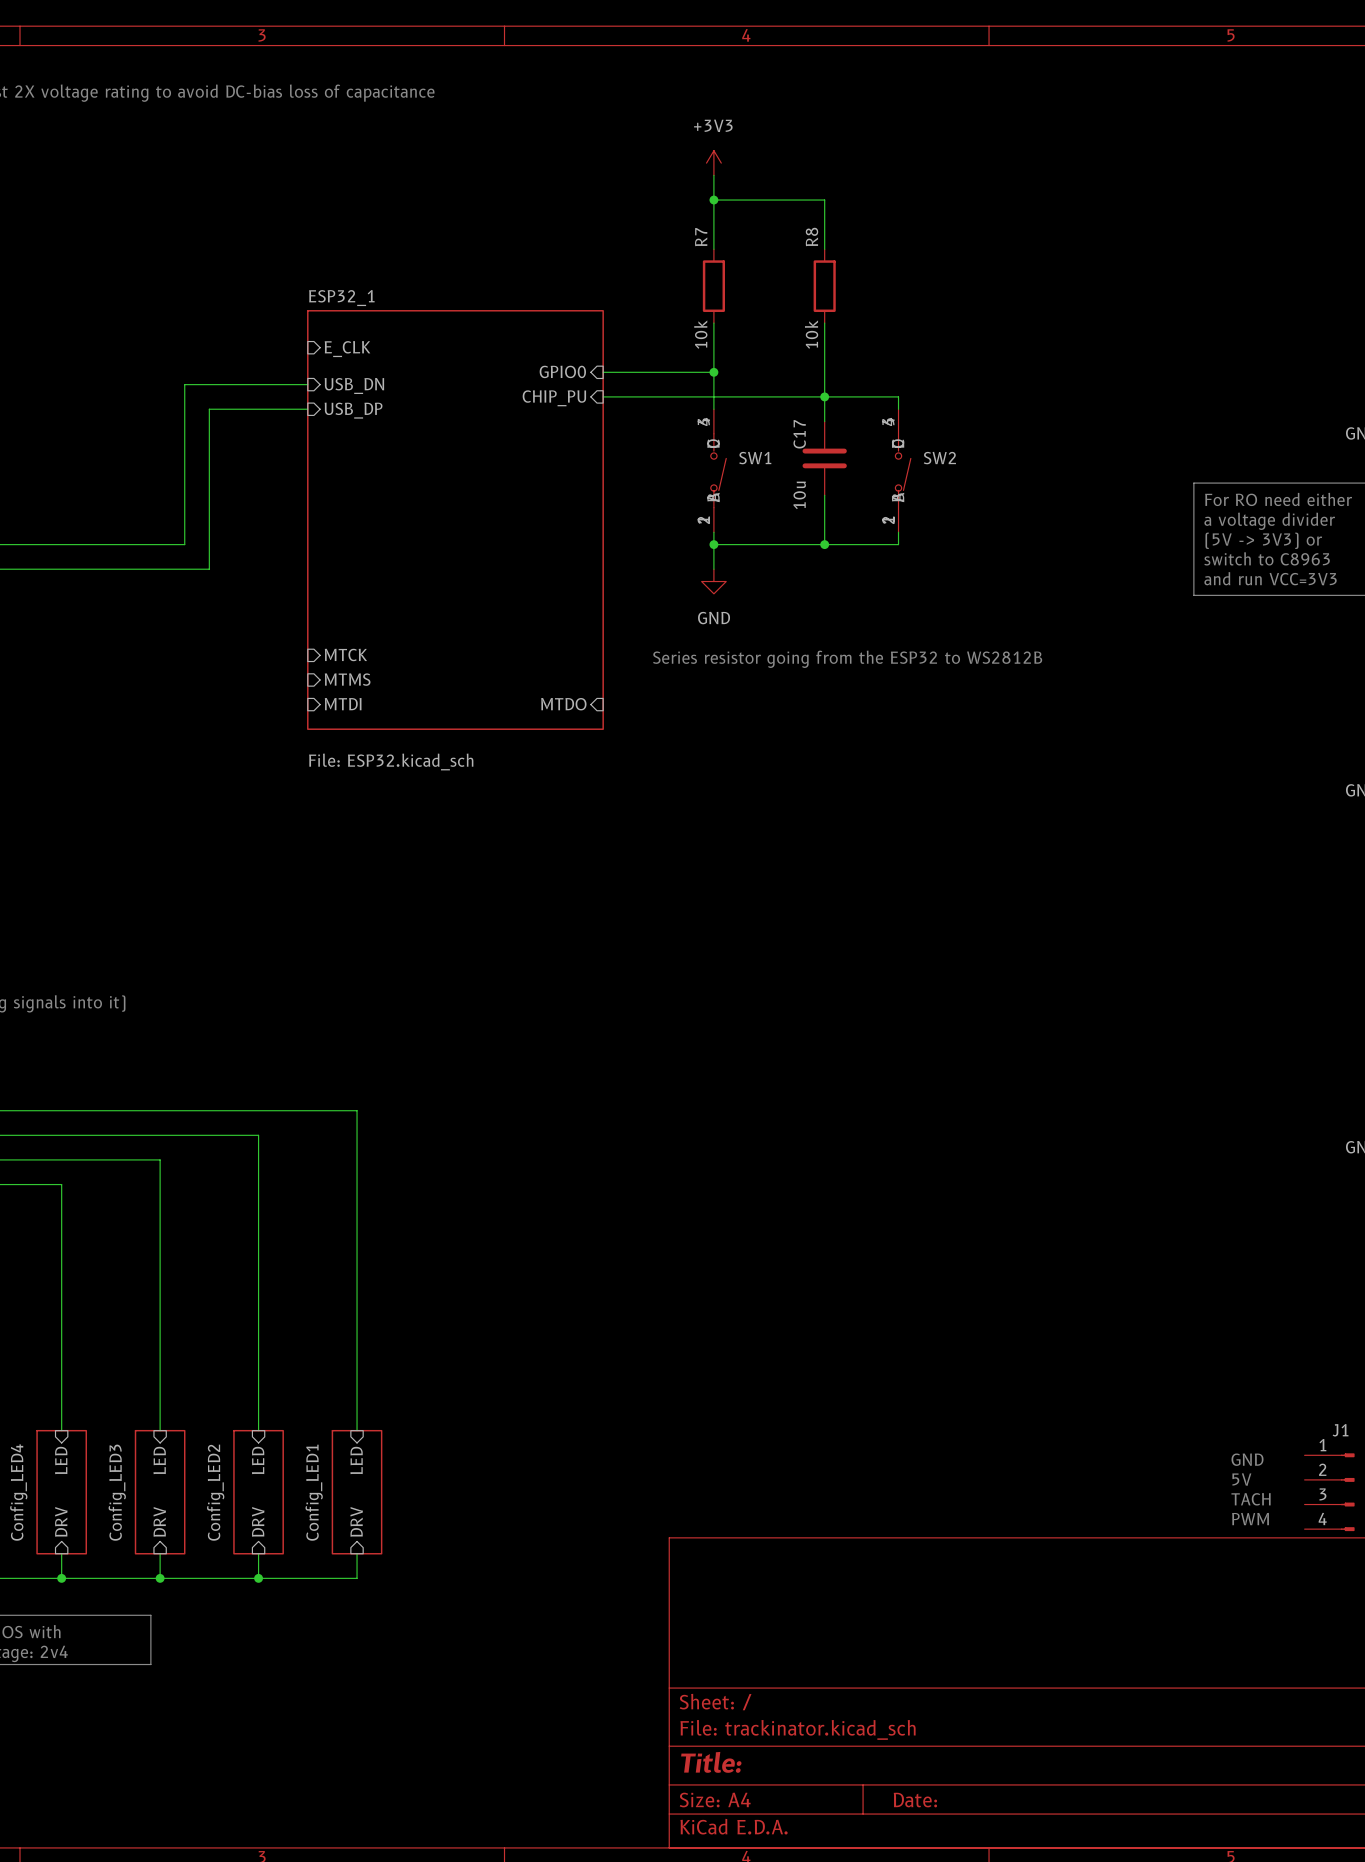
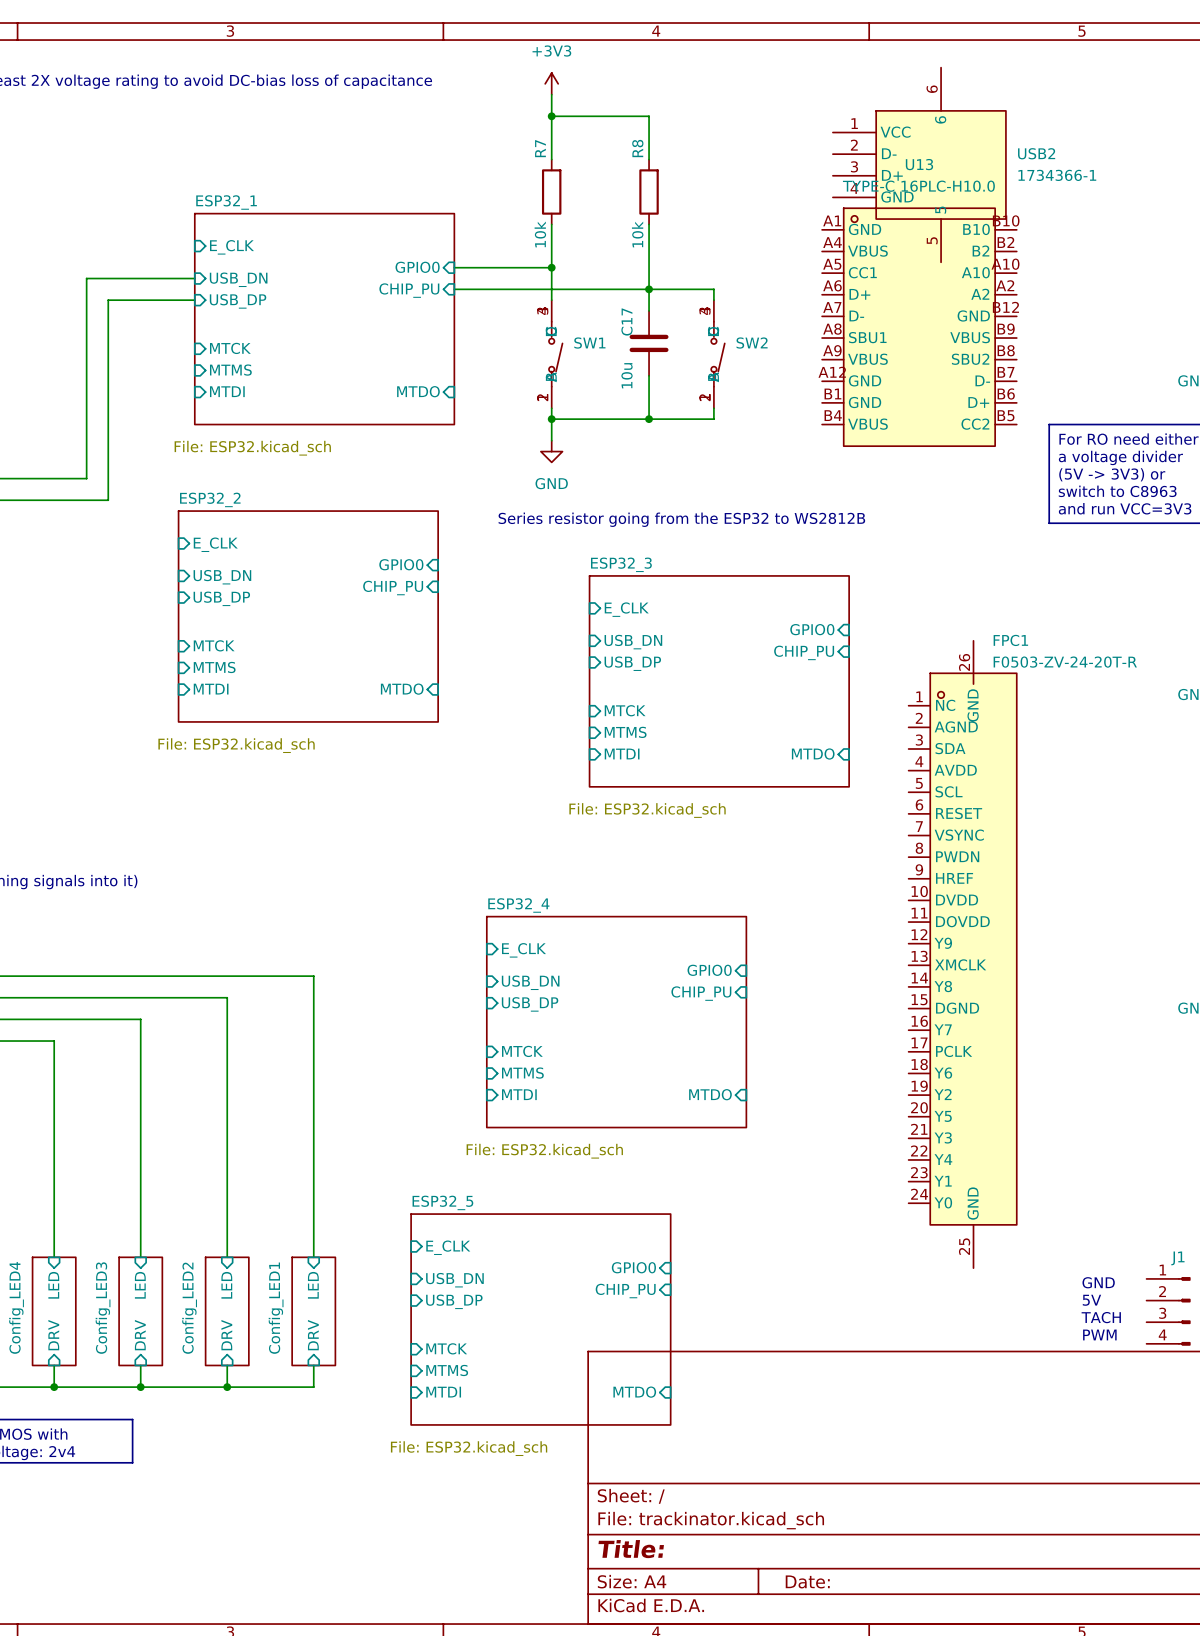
junction: none -> (551, 116)
power symbol position: +3V3 (713, 163) -> +3V3 (551, 83)
wire: (713, 175) (713, 249) -> (551, 94) (551, 159)
USB2: none -> 1734366-1 (919, 164)
wire: (713, 200) (824, 200) (824, 249) -> (551, 116) (649, 116) (649, 159)
junction: (713, 200) -> none
R7 position: (713, 286) -> (551, 192)
R8 position: (824, 286) -> (649, 192)
sheet ESP32_1 name position: ESP32_1 (341, 298) -> ESP32_1 (226, 202)
junction: none -> (551, 267)
sheet ESP32_1 shape: [307, 310, 604, 730] -> [194, 212, 456, 426]
wire: (713, 323) (713, 409) -> (551, 224) (551, 300)
wire: (824, 323) (824, 421) -> (649, 224) (649, 310)
sheet pin position: E_CLK (347, 349) -> E_CLK (231, 247)
sheet pin position: GPIO0 (562, 371) -> GPIO0 (417, 267)
wire: (603, 372) (713, 372) -> (454, 267) (551, 267)
junction position: (713, 372) -> (649, 289)
U13: none -> TYPE-C 16PLC-H10.0 (919, 327)
wire: (307, 384) (184, 384) (184, 544) (98, 544) -> (194, 278) (86, 278) (86, 478)
sheet pin position: USB_DN (354, 386) -> USB_DN (238, 279)
sheet pin: none -> MTCK (230, 348)
wire: (603, 396) (898, 396) (898, 409) -> (454, 289) (713, 289) (713, 300)
junction: (824, 396) -> none
sheet pin position: CHIP_PU (554, 398) -> CHIP_PU (409, 290)
wire: (307, 409) (209, 409) (209, 569) (123, 569) -> (194, 300) (108, 300) (108, 500)
sheet pin position: USB_DP (353, 410) -> USB_DP (238, 301)
sheet pin: none -> MTMS (230, 370)
sheet pin: none -> MTDI (227, 391)
sheet pin: none -> MTDO (418, 391)
C17 position: (824, 458) -> (649, 343)
SW1 position: (718, 470) -> (555, 354)
SW2 position: (903, 470) -> (717, 354)
junction: none -> (551, 419)
junction: none -> (649, 419)
wire: (824, 495) (824, 544) -> (649, 375) (649, 419)
wire: (713, 532) (713, 569) -> (551, 408) (551, 440)
wire: (898, 532) (898, 544) (713, 544) -> (713, 408) (713, 419) (551, 419)
junction: (713, 544) -> none
junction: (824, 544) -> none
power symbol position: GND (713, 581) -> GND (551, 451)
sheet pin: none -> E_CLK (215, 544)
sheet pin: none -> GPIO0 (401, 564)
sheet pin position: MTCK (345, 654) -> MTCK (214, 645)
sheet pin: none -> USB_DN (222, 577)
text position: Series resistor going from the ESP32 to WS2812B (847, 659) -> Series resistor going from the ESP32 to WS2812B (681, 519)
sheet pin: none -> CHIP_PU (393, 588)
sheet pin position: MTMS (347, 679) -> MTMS (214, 667)
sheet pin: none -> USB_DP (221, 598)
sheet pin: none -> E_CLK (626, 609)
sheet ESP32_2: none -> File: ESP32.kicad_sch (308, 616)
sheet pin position: MTDI (343, 704) -> MTDI (211, 689)
sheet pin position: MTDO (563, 704) -> MTDO (402, 689)
sheet pin: none -> GPIO0 (812, 629)
sheet pin: none -> USB_DN (633, 642)
sheet pin: none -> CHIP_PU (804, 652)
sheet pin: none -> USB_DP (632, 663)
sheet ESP32_1 value position: File: ESP32.kicad_sch (391, 761) -> File: ESP32.kicad_sch (252, 448)
sheet ESP32_3: none -> File: ESP32.kicad_sch (719, 681)
sheet pin: none -> MTCK (625, 710)
sheet pin: none -> MTMS (625, 732)
sheet pin: none -> MTDI (622, 754)
sheet pin: none -> MTDO (813, 754)
sheet pin: none -> E_CLK (523, 950)
FPC1: none -> F0503-ZV-24-20T-R (962, 954)
sheet pin: none -> GPIO0 (709, 970)
sheet pin: none -> USB_DN (530, 982)
sheet pin: none -> CHIP_PU (701, 993)
sheet pin: none -> USB_DP (530, 1004)
sheet ESP32_4: none -> File: ESP32.kicad_sch (616, 1022)
sheet pin: none -> MTCK (522, 1051)
sheet pin: none -> MTMS (522, 1073)
sheet pin: none -> MTDI (519, 1094)
sheet pin: none -> MTDO (710, 1094)
sheet pin: none -> E_CLK (448, 1247)
sheet pin: none -> GPIO0 (633, 1267)
sheet pin: none -> USB_DN (454, 1280)
sheet pin: none -> CHIP_PU (625, 1291)
sheet pin: none -> USB_DP (454, 1301)
sheet ESP32_5: none -> File: ESP32.kicad_sch (540, 1319)
sheet pin: none -> MTCK (446, 1348)
sheet pin: none -> MTMS (447, 1370)
sheet pin: none -> MTDI (443, 1392)
sheet pin: none -> MTDO (634, 1392)

